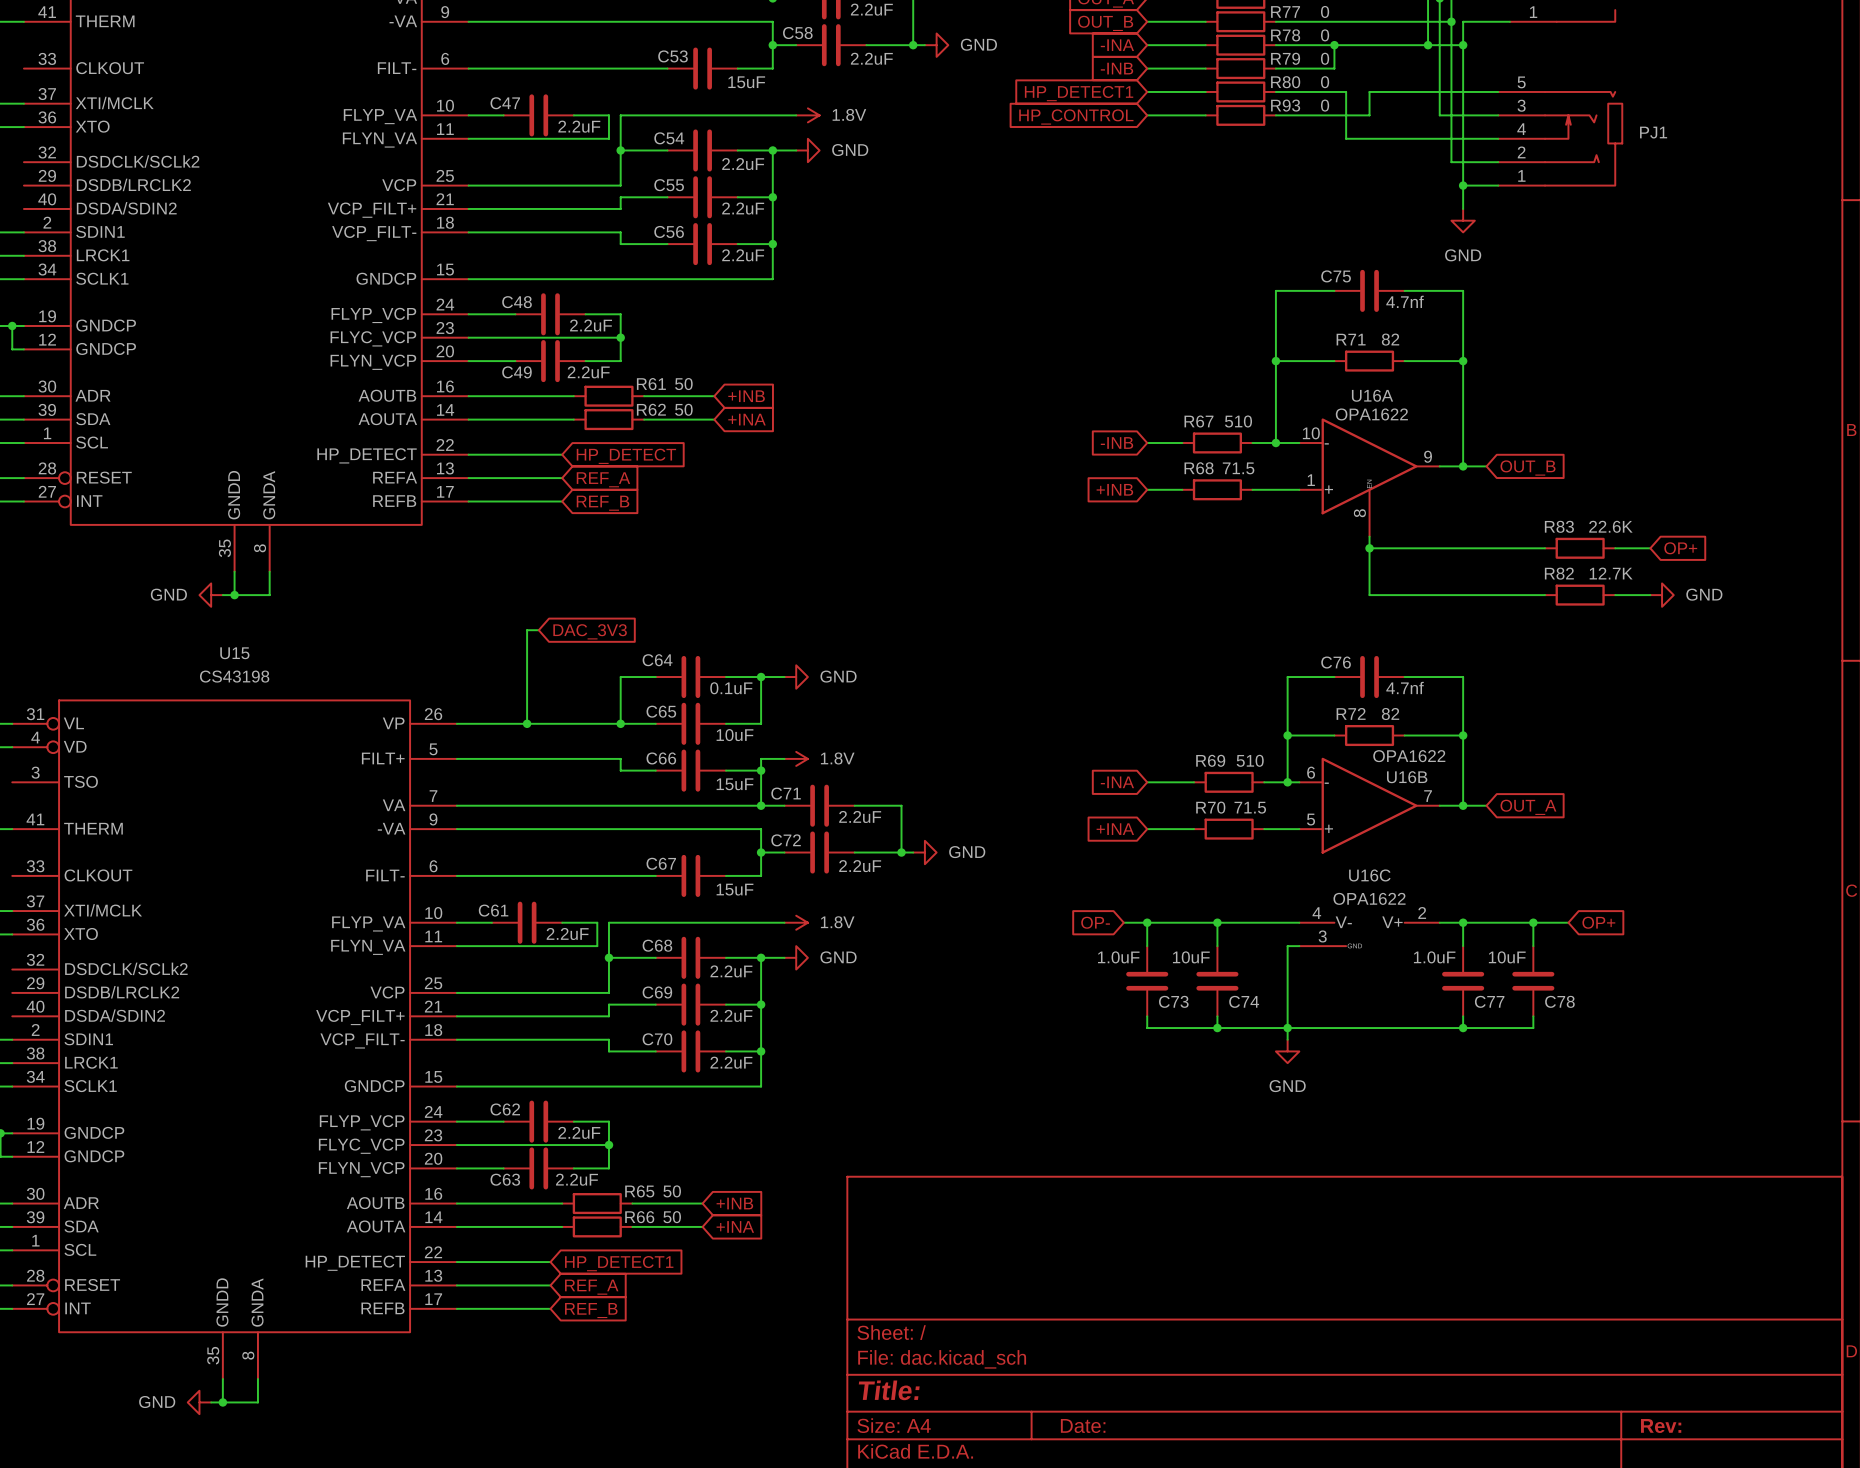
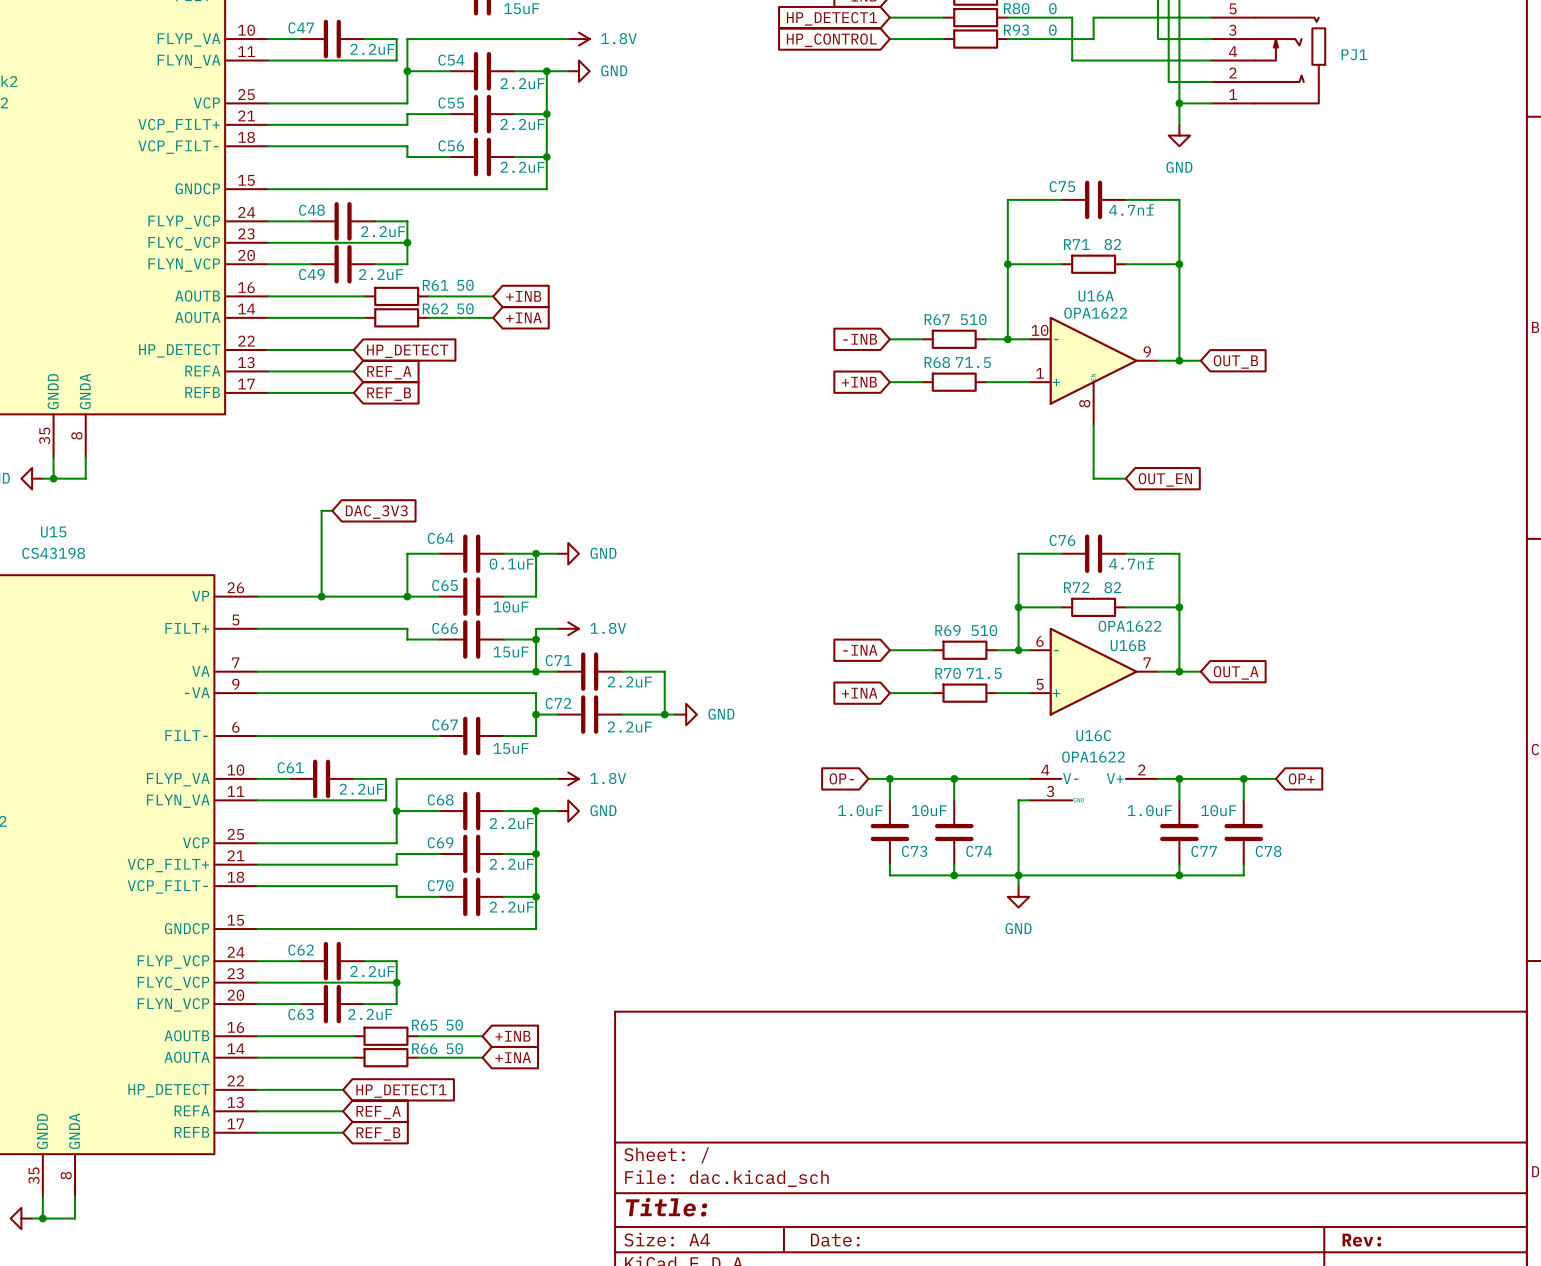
wire: (1369, 548) (1545, 548) -> none
junction: (1369, 548) -> none
R83: 22.6K (1580, 548) -> none
wire: (1615, 548) (1650, 548) -> none
global label: OP+ (1680, 548) -> none
wire: (1404, 595) (1545, 595) -> none
R82: 12.7K (1580, 595) -> none
wire: (1615, 595) (1650, 595) -> none
power symbol: GND (1662, 595) -> none
global label: none -> OUT_EN (1165, 479)

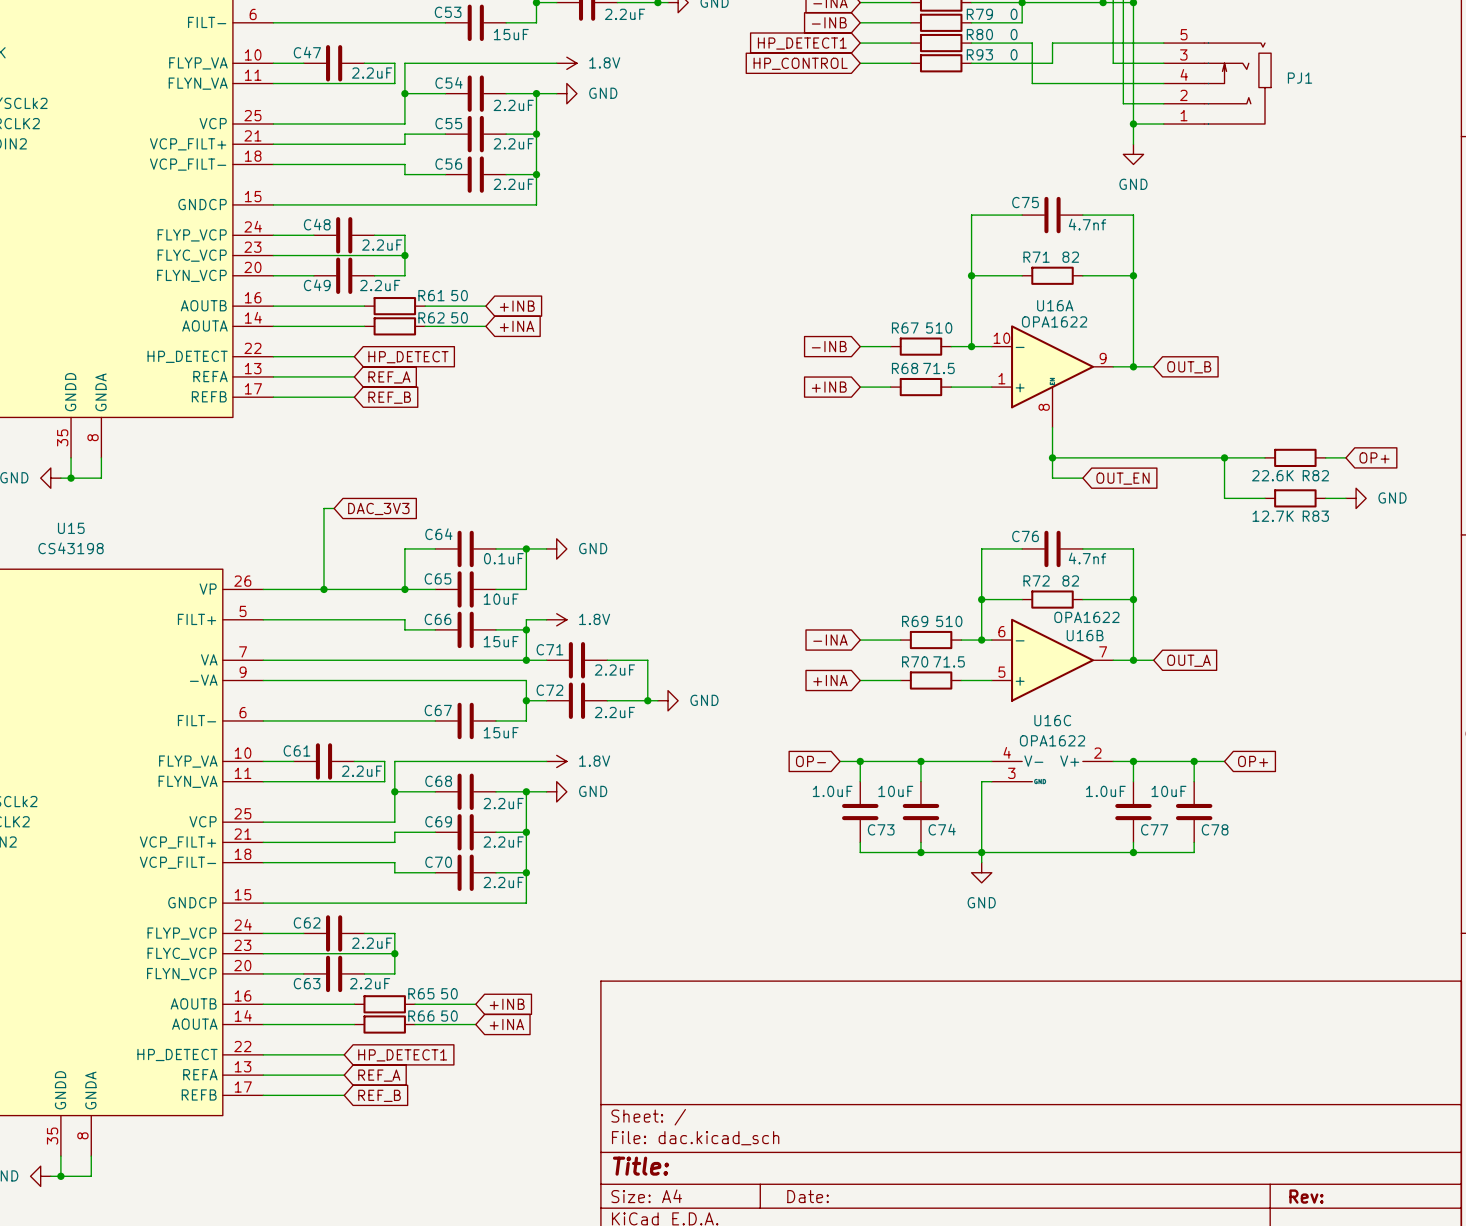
wire: none -> (1052, 457) (1265, 457)
junction: none -> (1052, 457)
wire: none -> (1224, 457) (1224, 498) (1265, 498)
junction: none -> (1224, 457)
R82: none -> 22.6K (1295, 457)
wire: none -> (1325, 457) (1345, 457)
global label: none -> OP+ (1374, 457)
R83: none -> 12.7K (1295, 498)
wire: none -> (1325, 498) (1345, 498)
power symbol: none -> GND (1356, 498)

